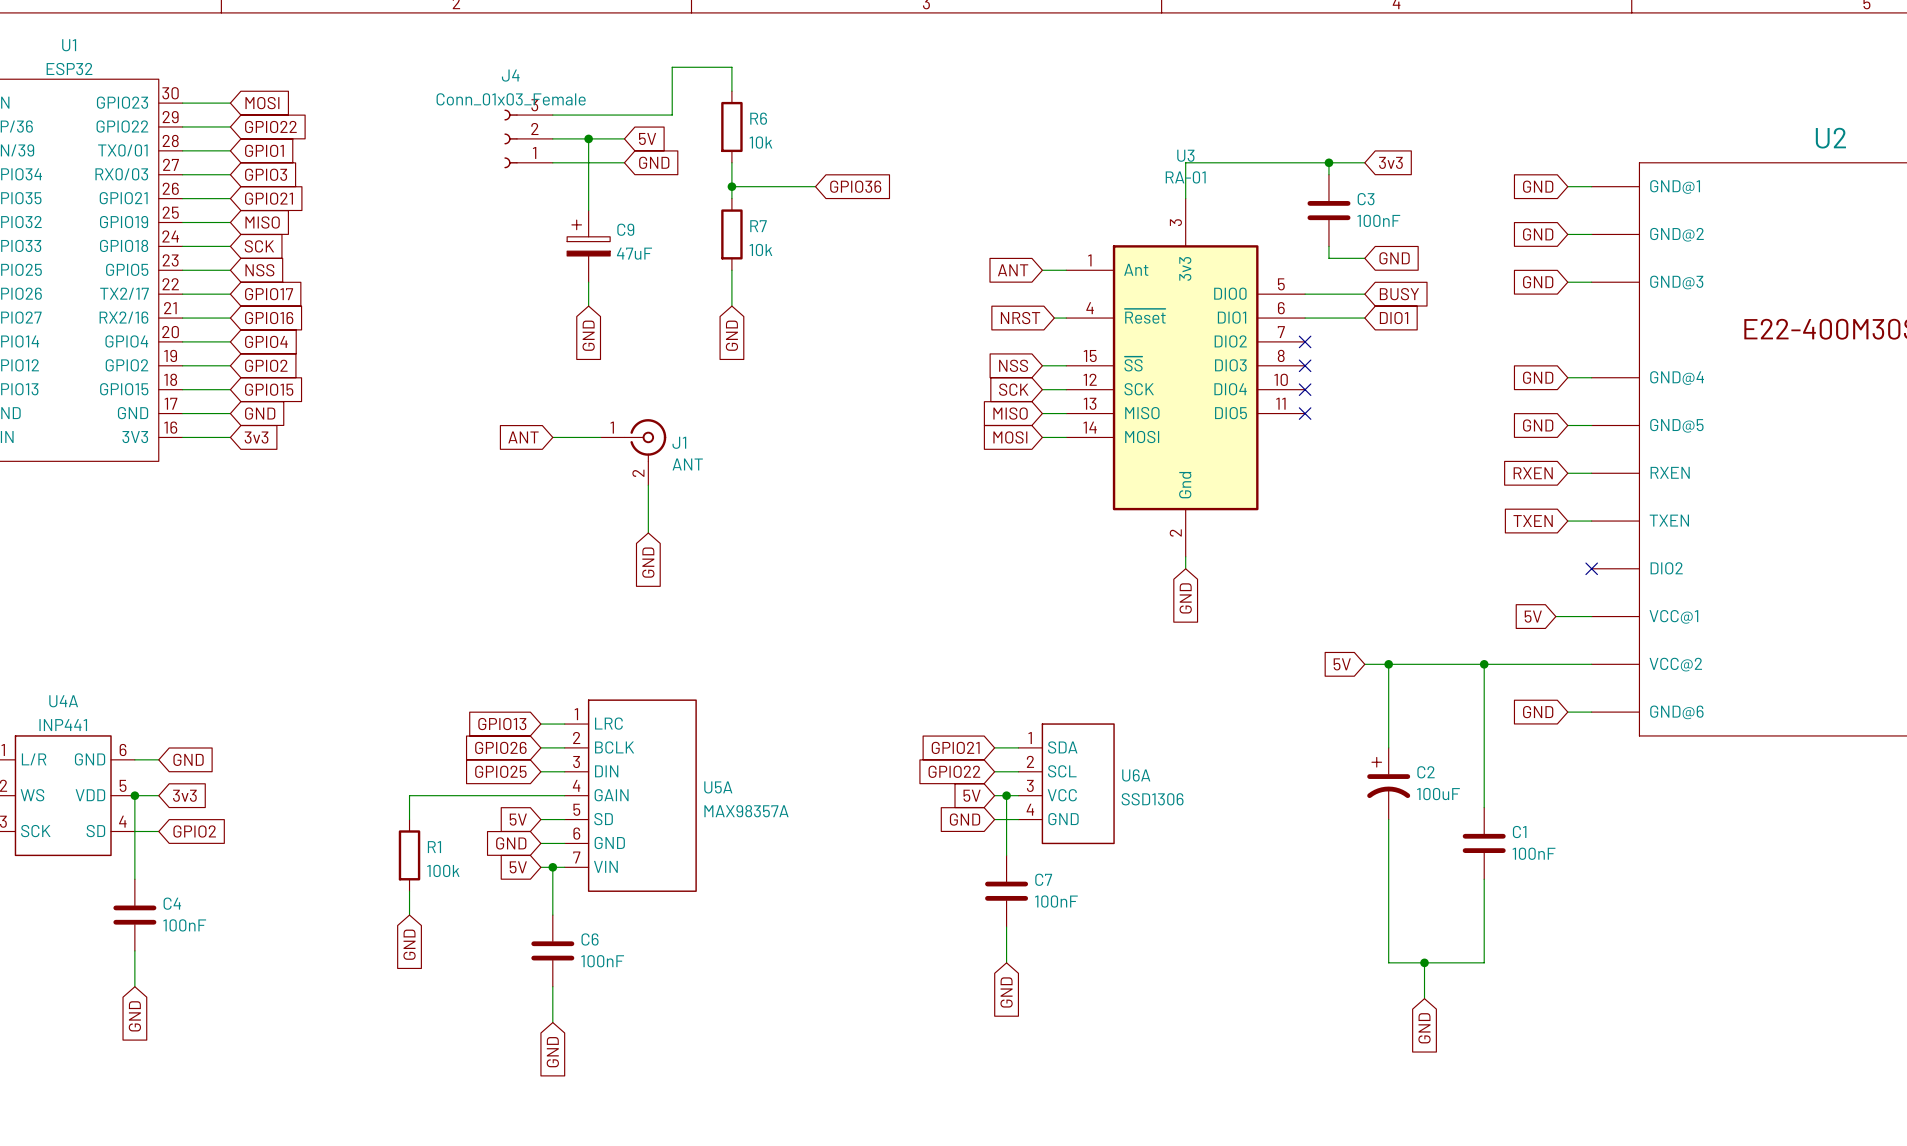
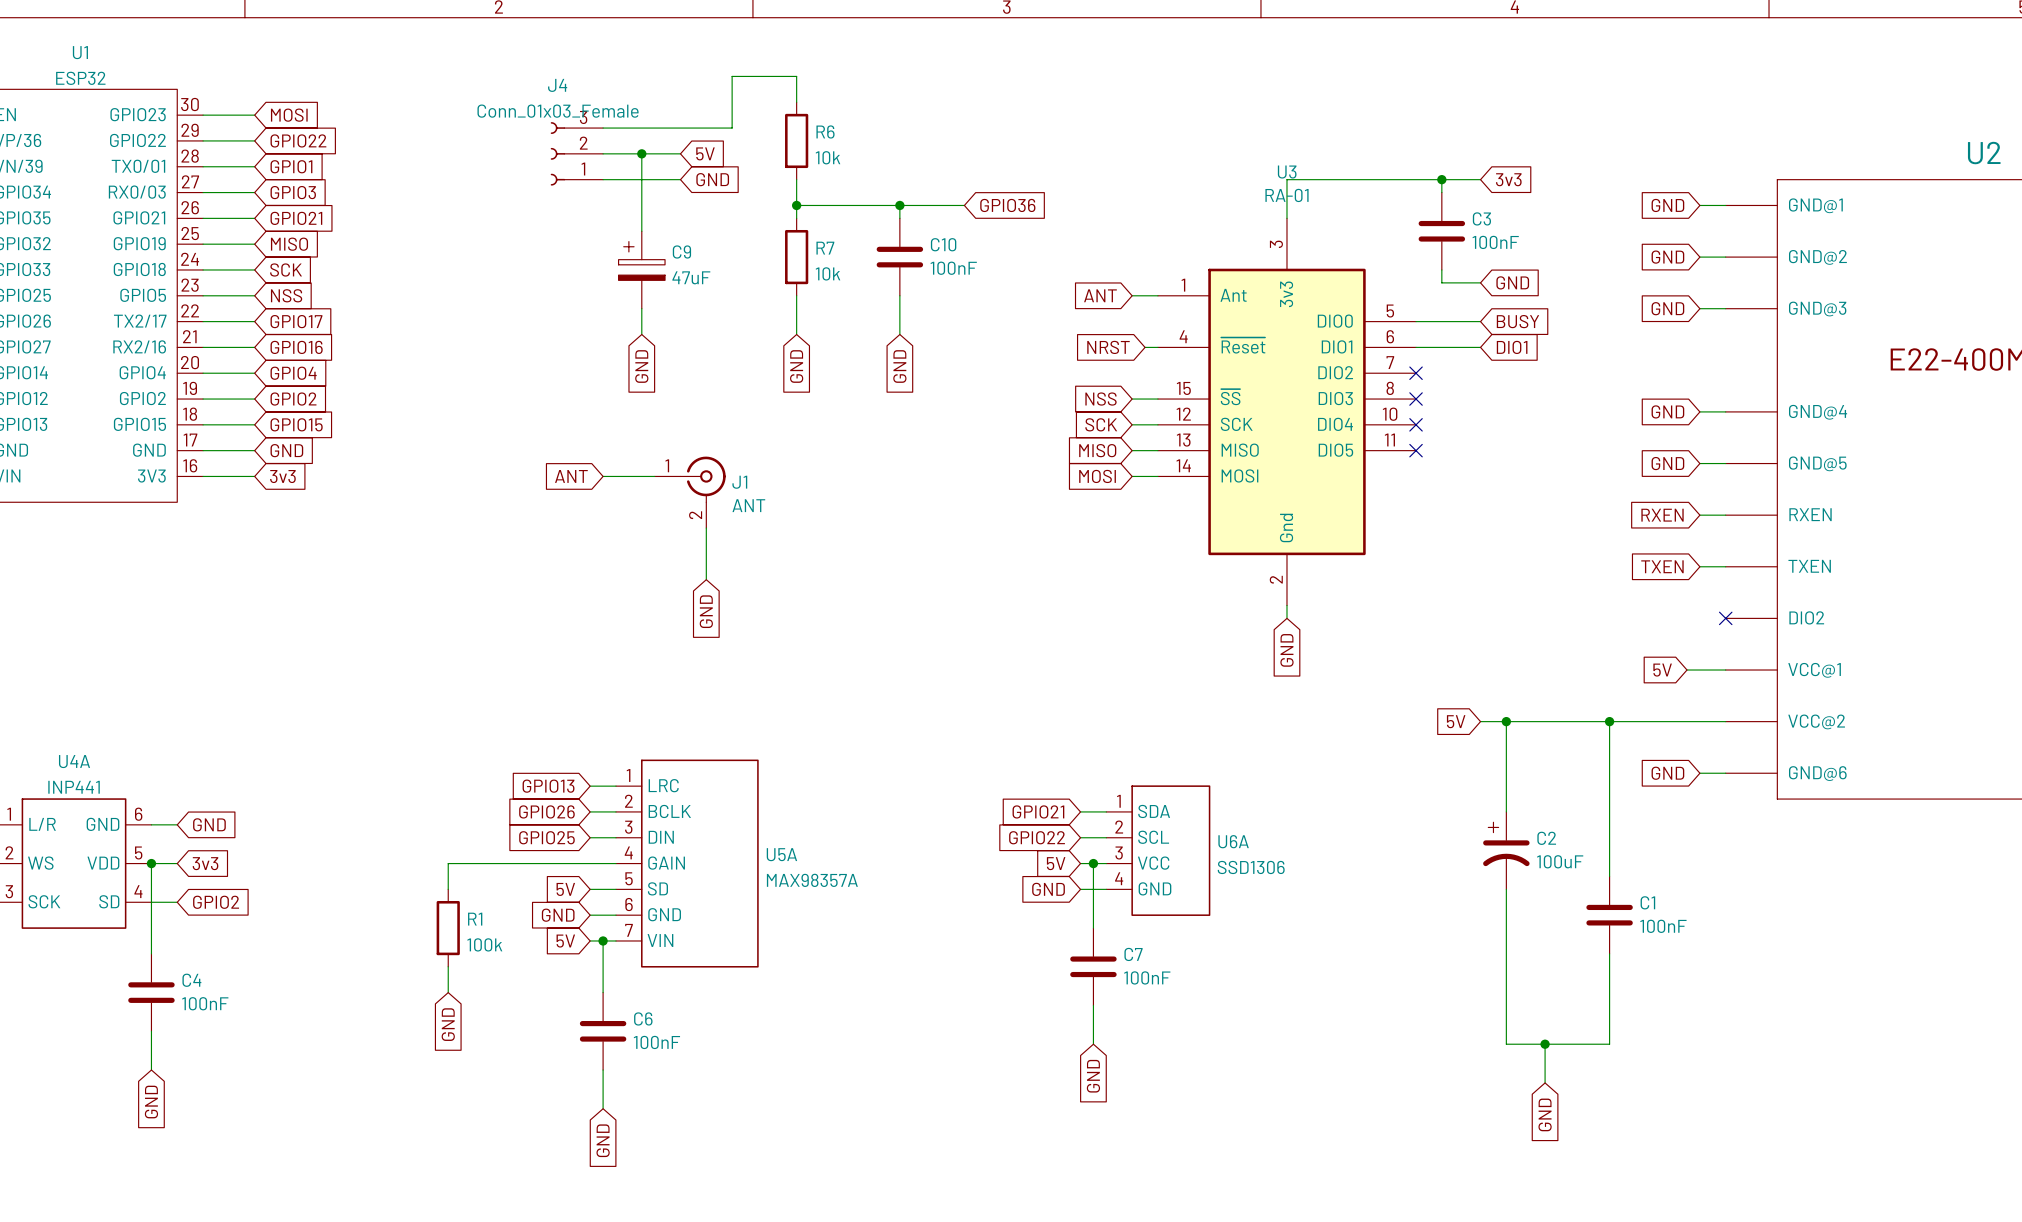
wire: none -> (886, 205) (964, 205)
wire: none -> (899, 205) (899, 218)
junction: none -> (899, 205)
global label position: GPIO36 (855, 186) -> GPIO36 (1007, 205)
C10: none -> 100nF (899, 257)
wire: none -> (899, 295) (899, 334)
global label: none -> GND (899, 366)

